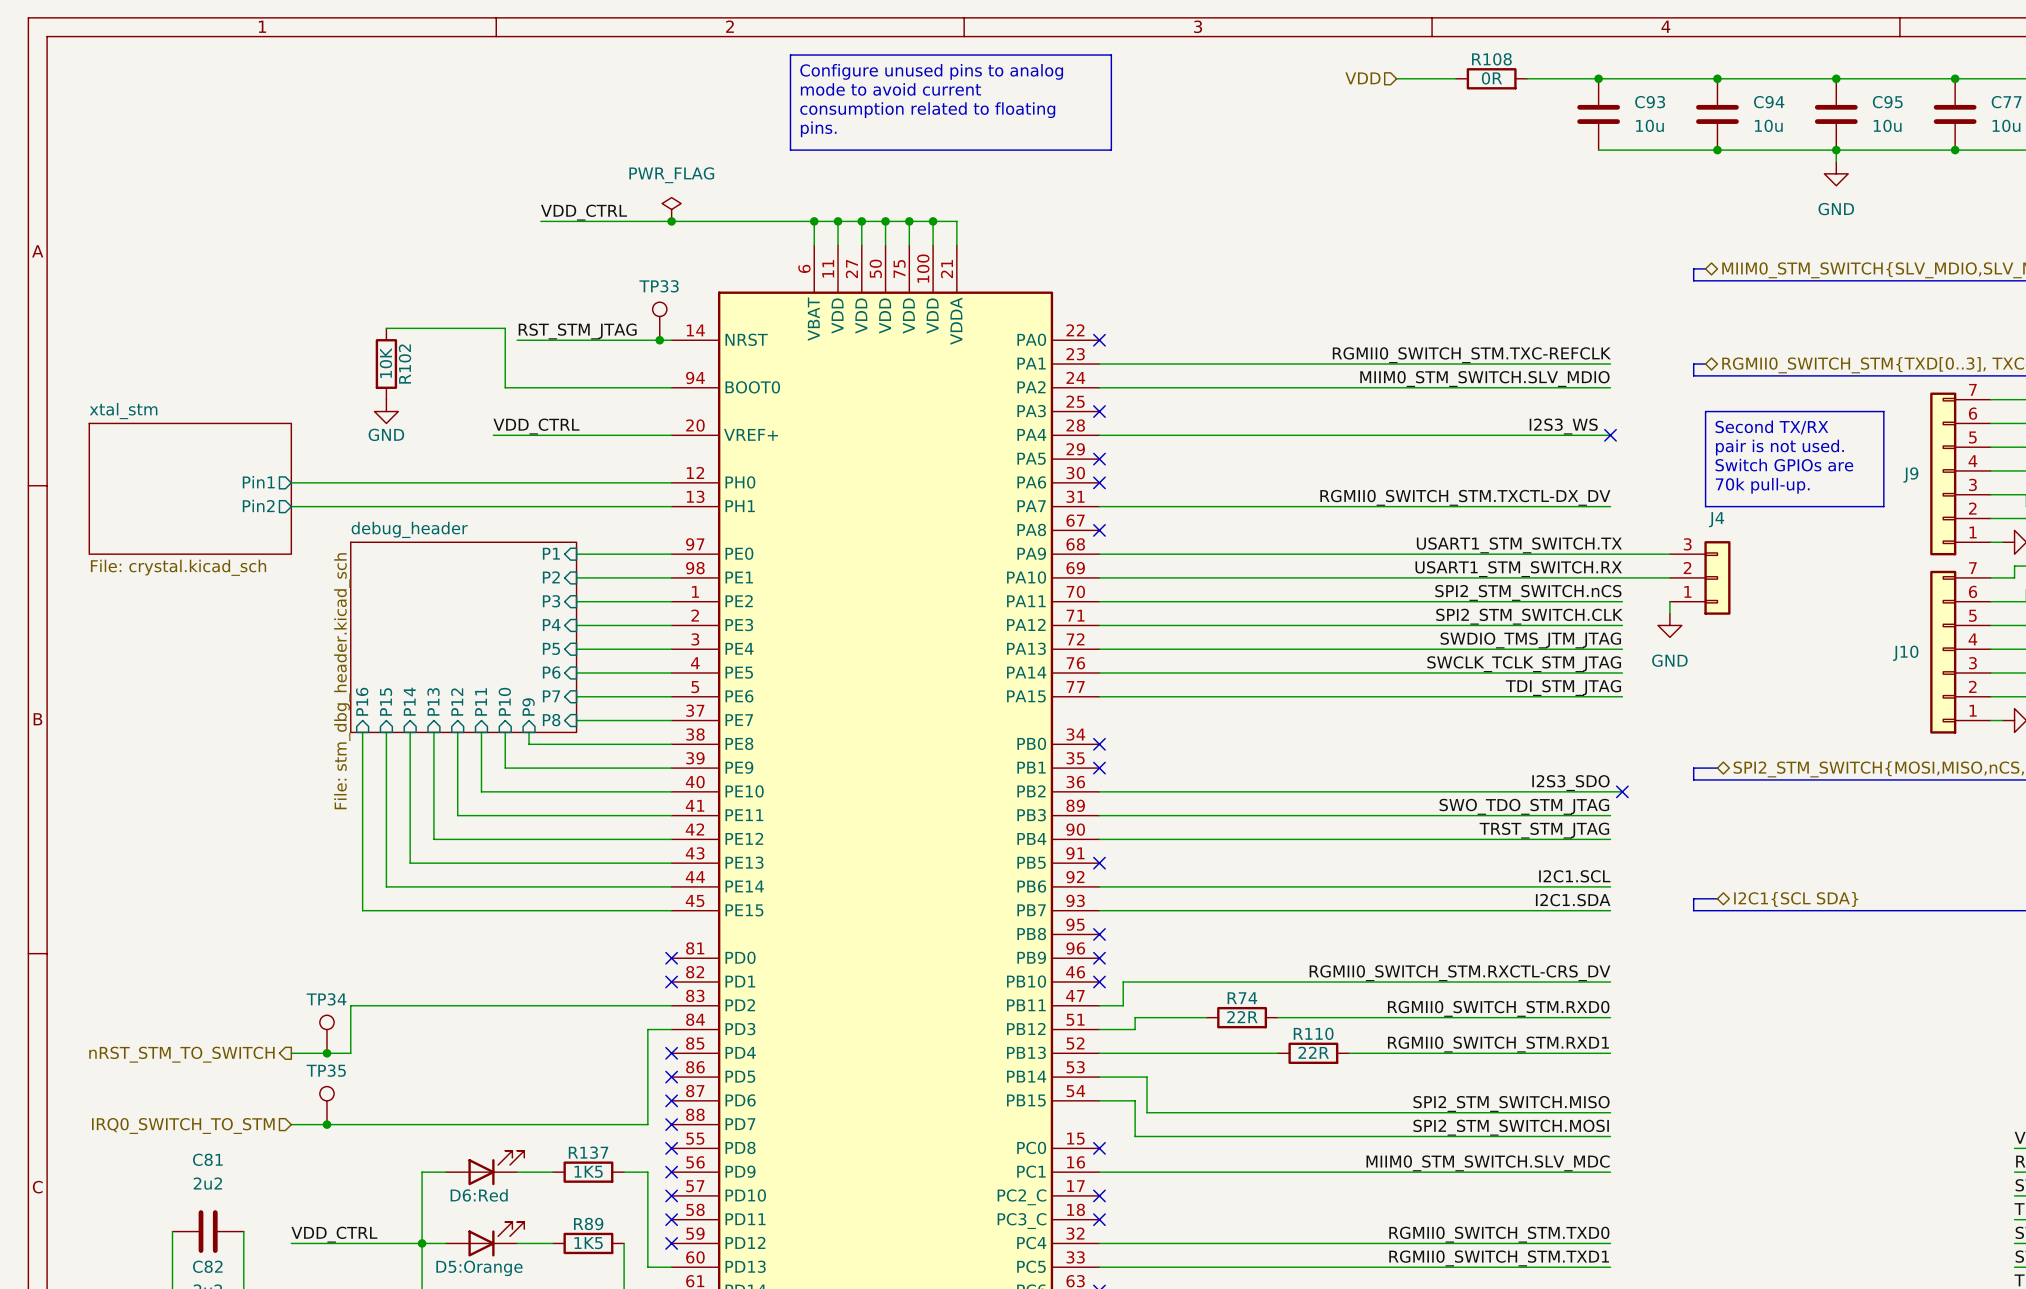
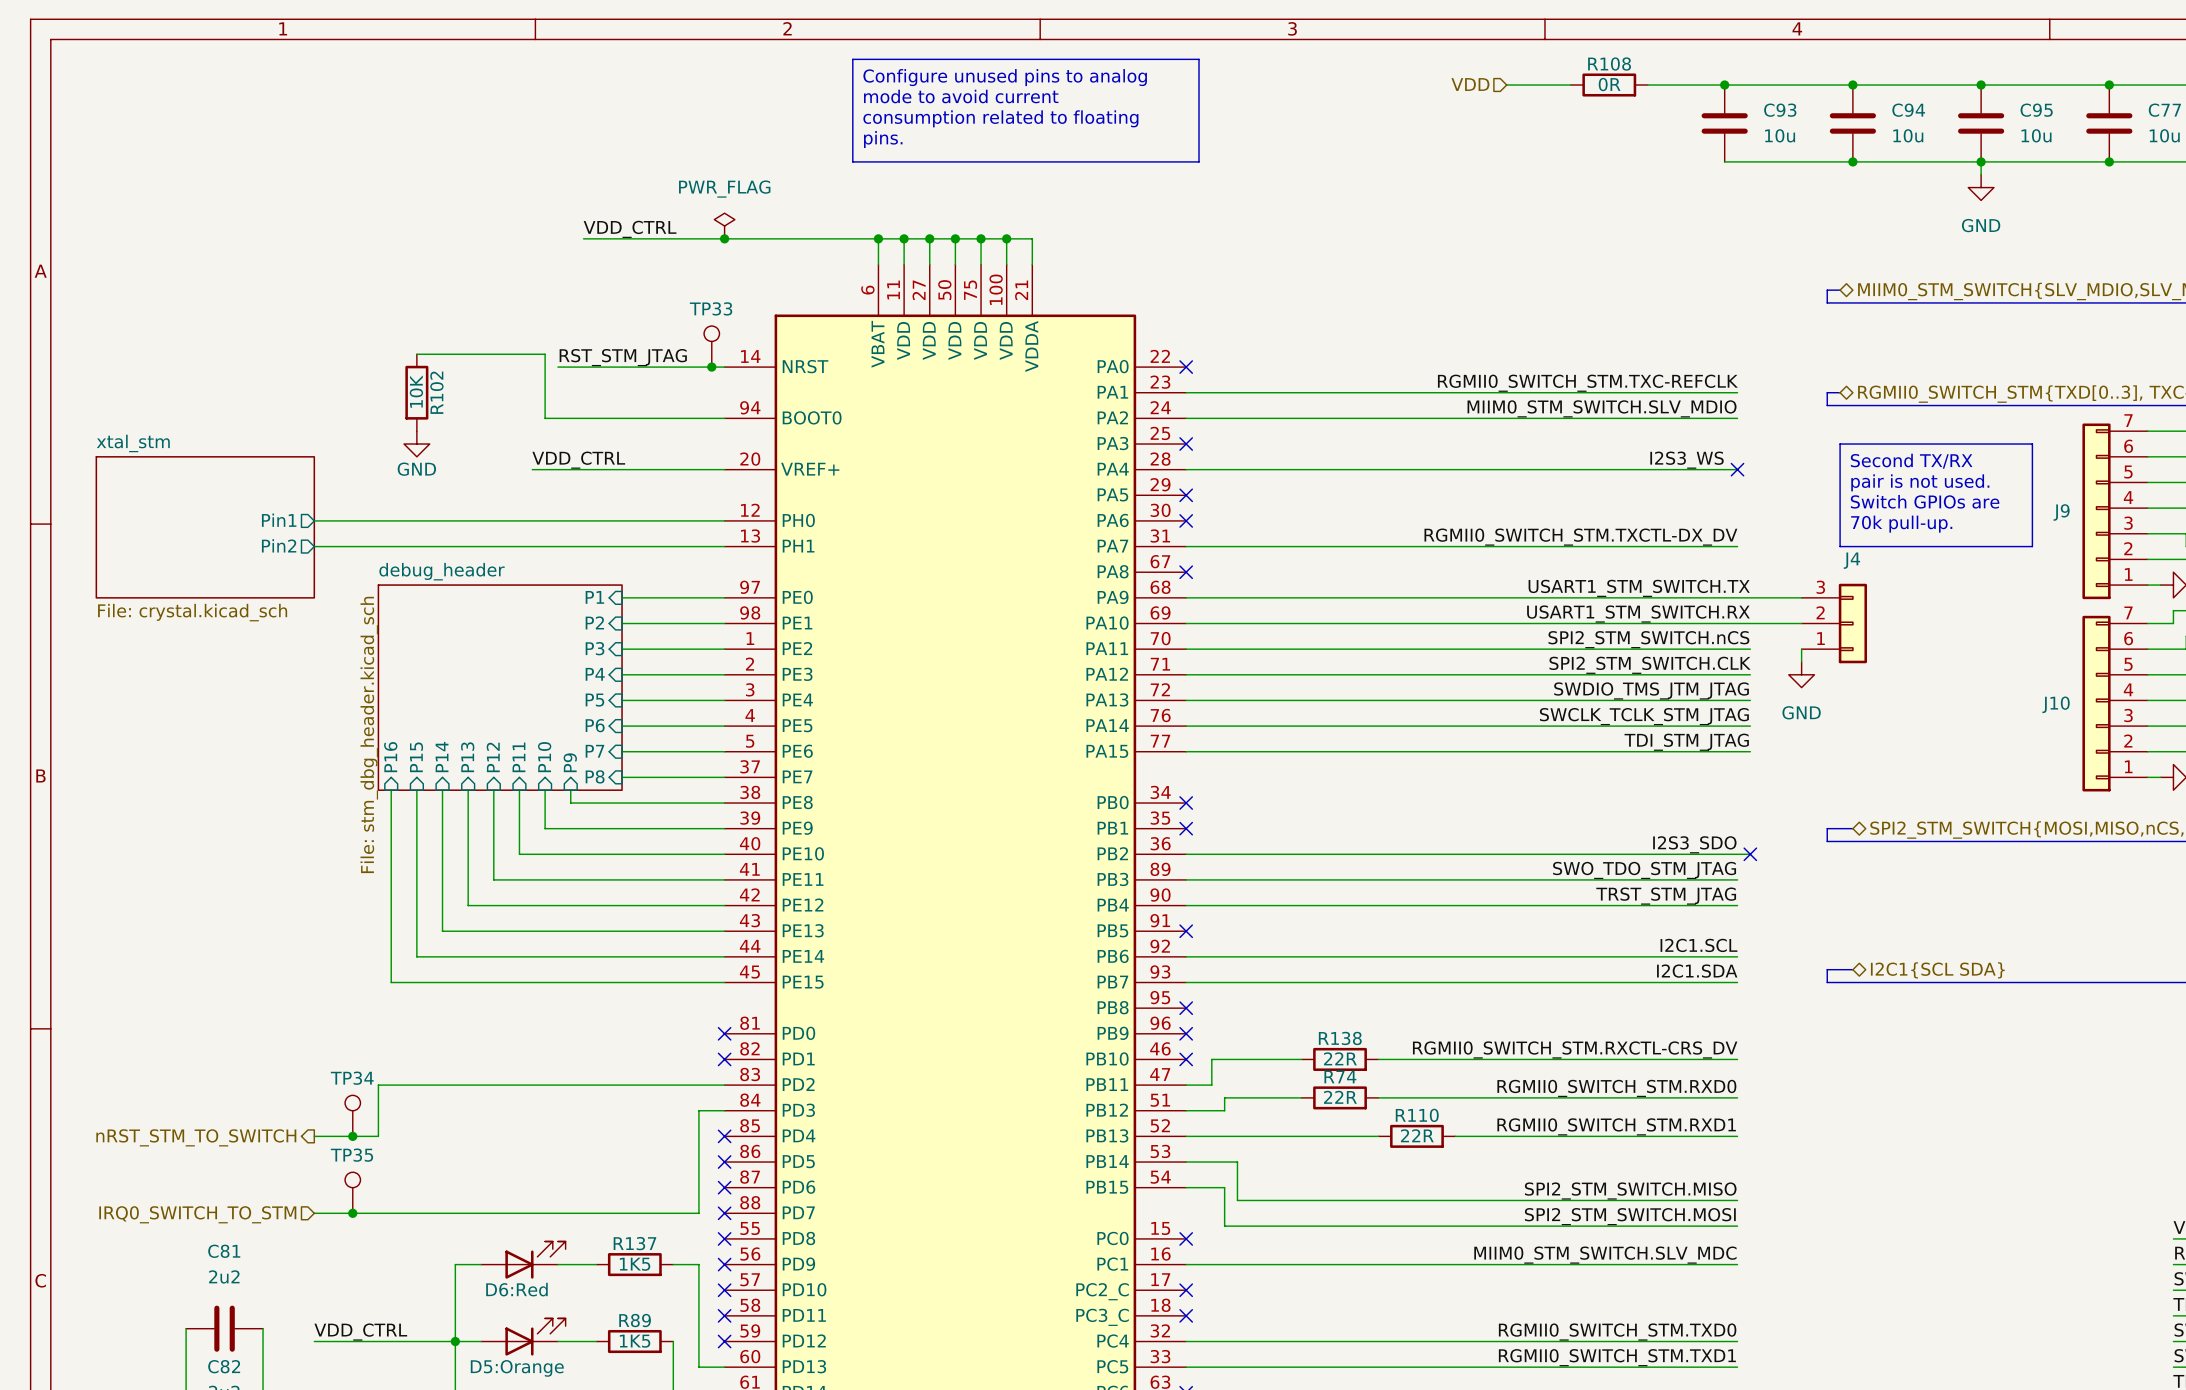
wire: (1206, 982) (1277, 982) -> none
R138: none -> 22R (1340, 1059)

